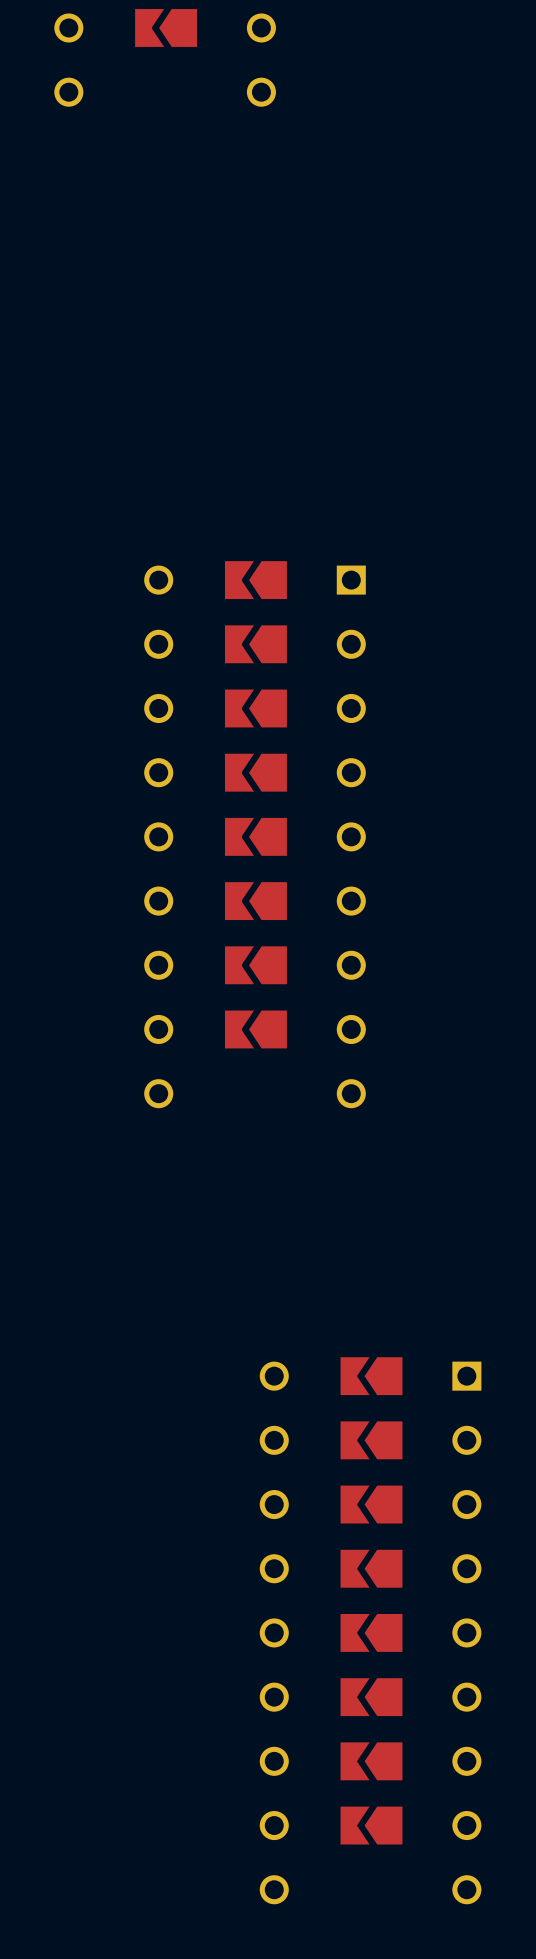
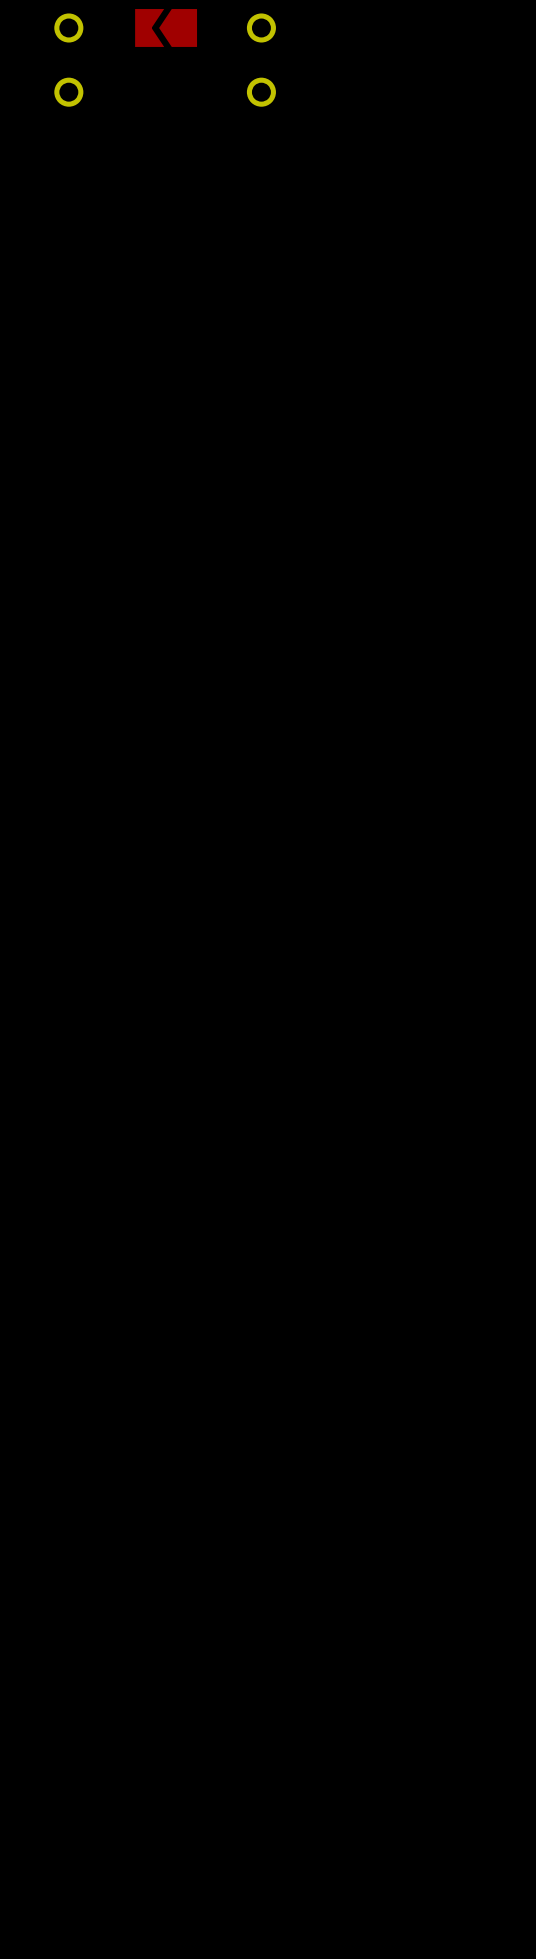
part: (255, 834) -> none
part: (370, 1630) -> none

